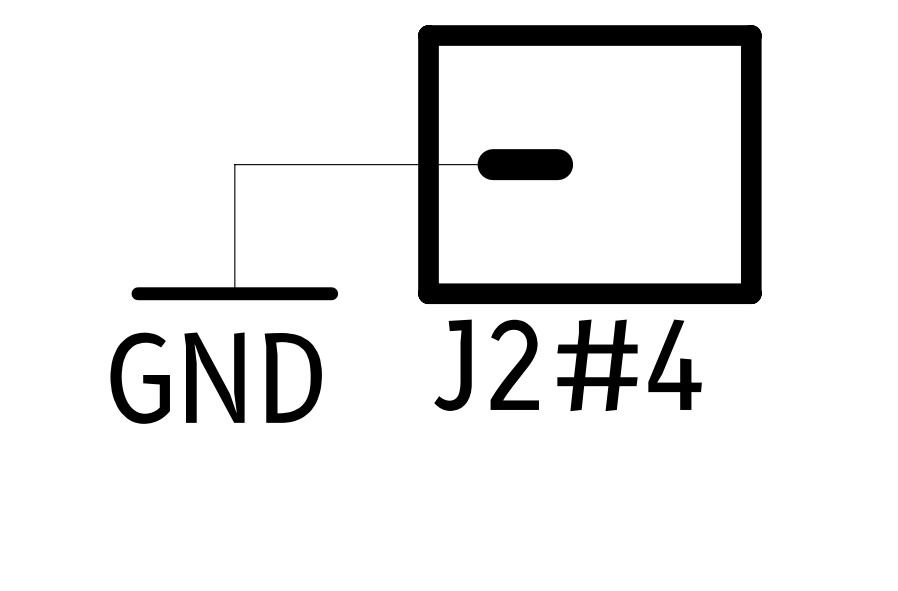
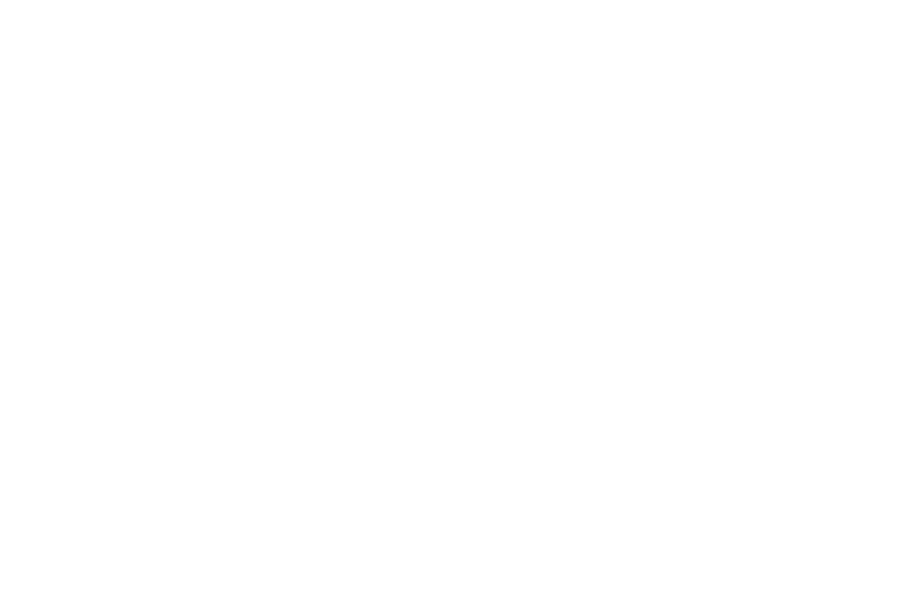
J2#4: (498, 164) -> none
power symbol: GND (234, 232) -> none

